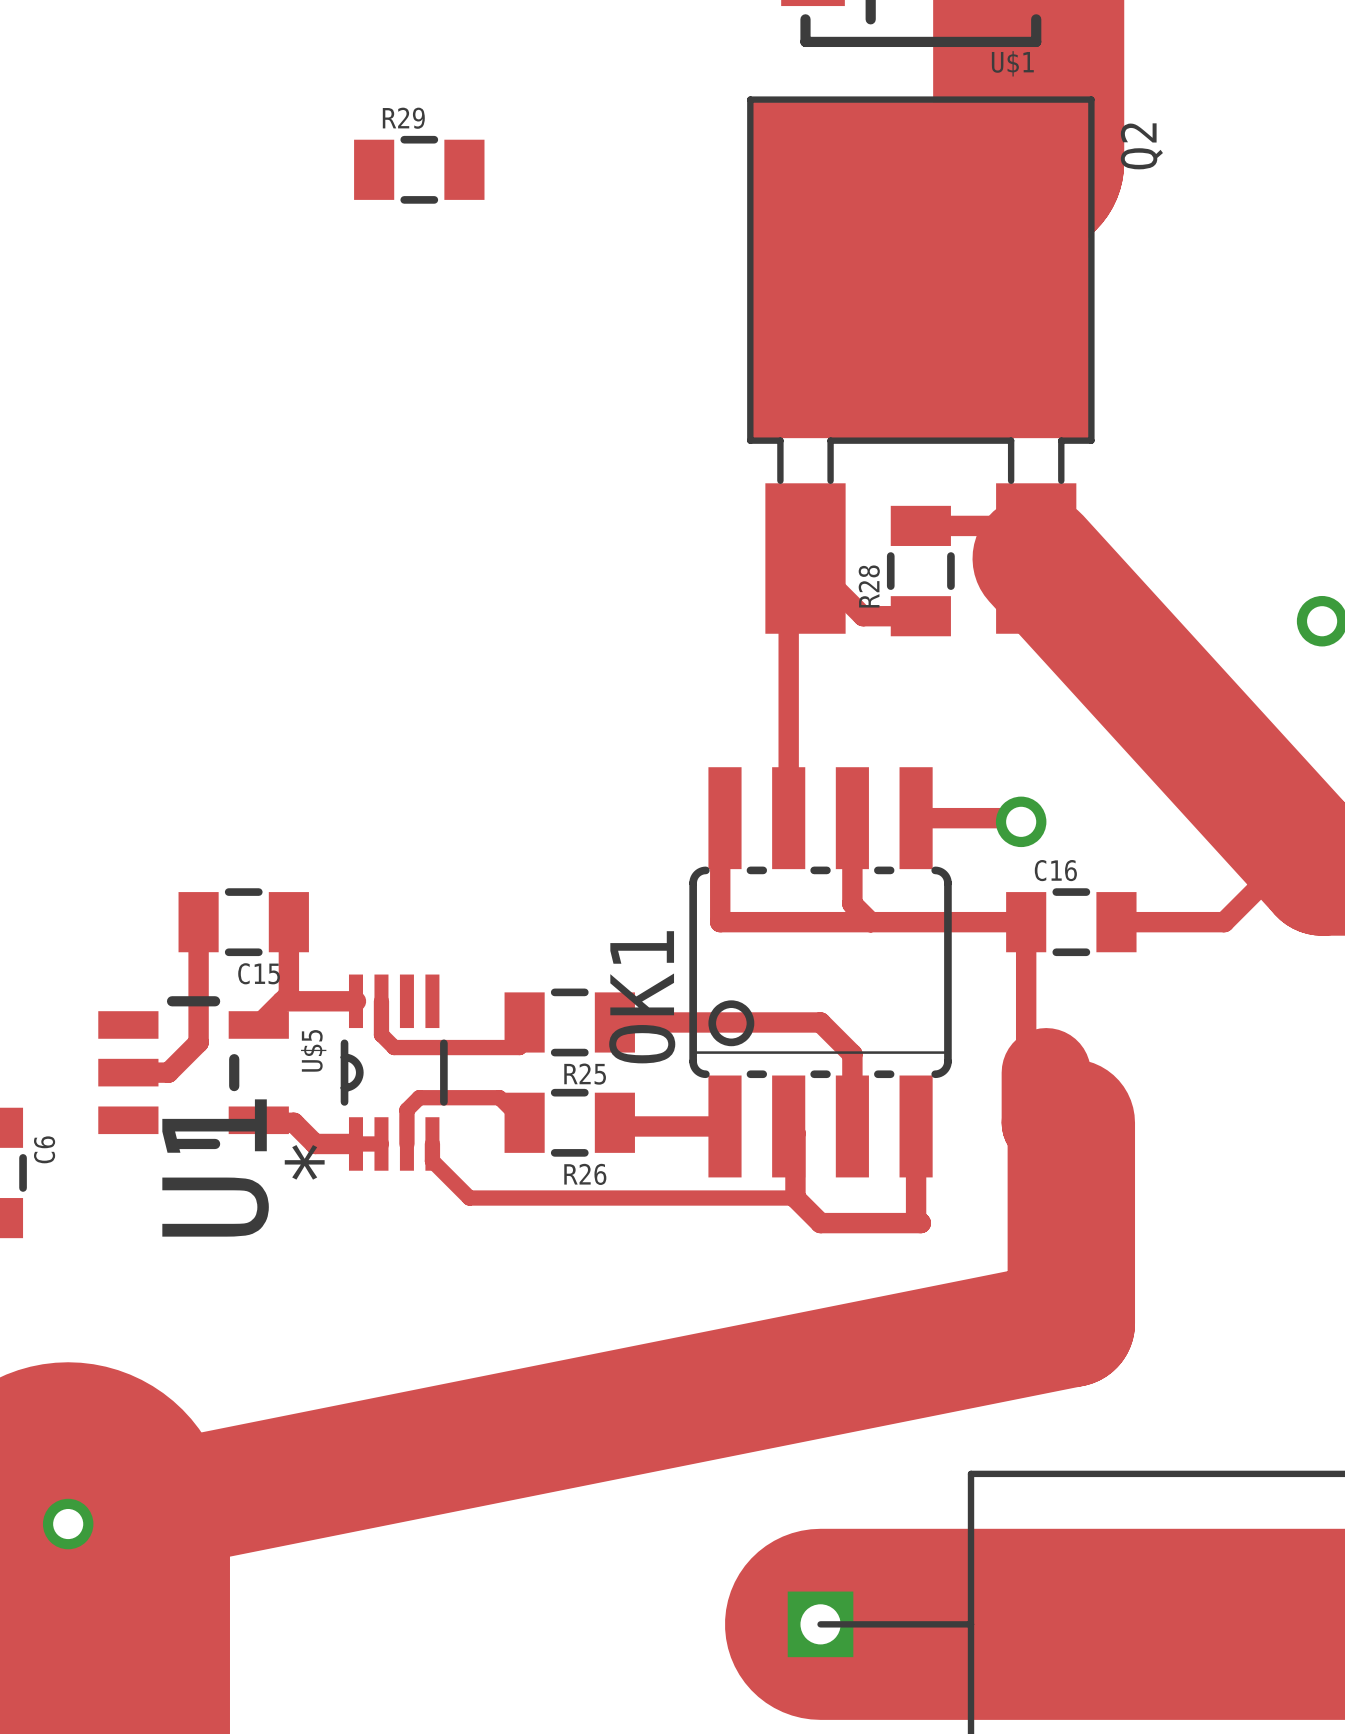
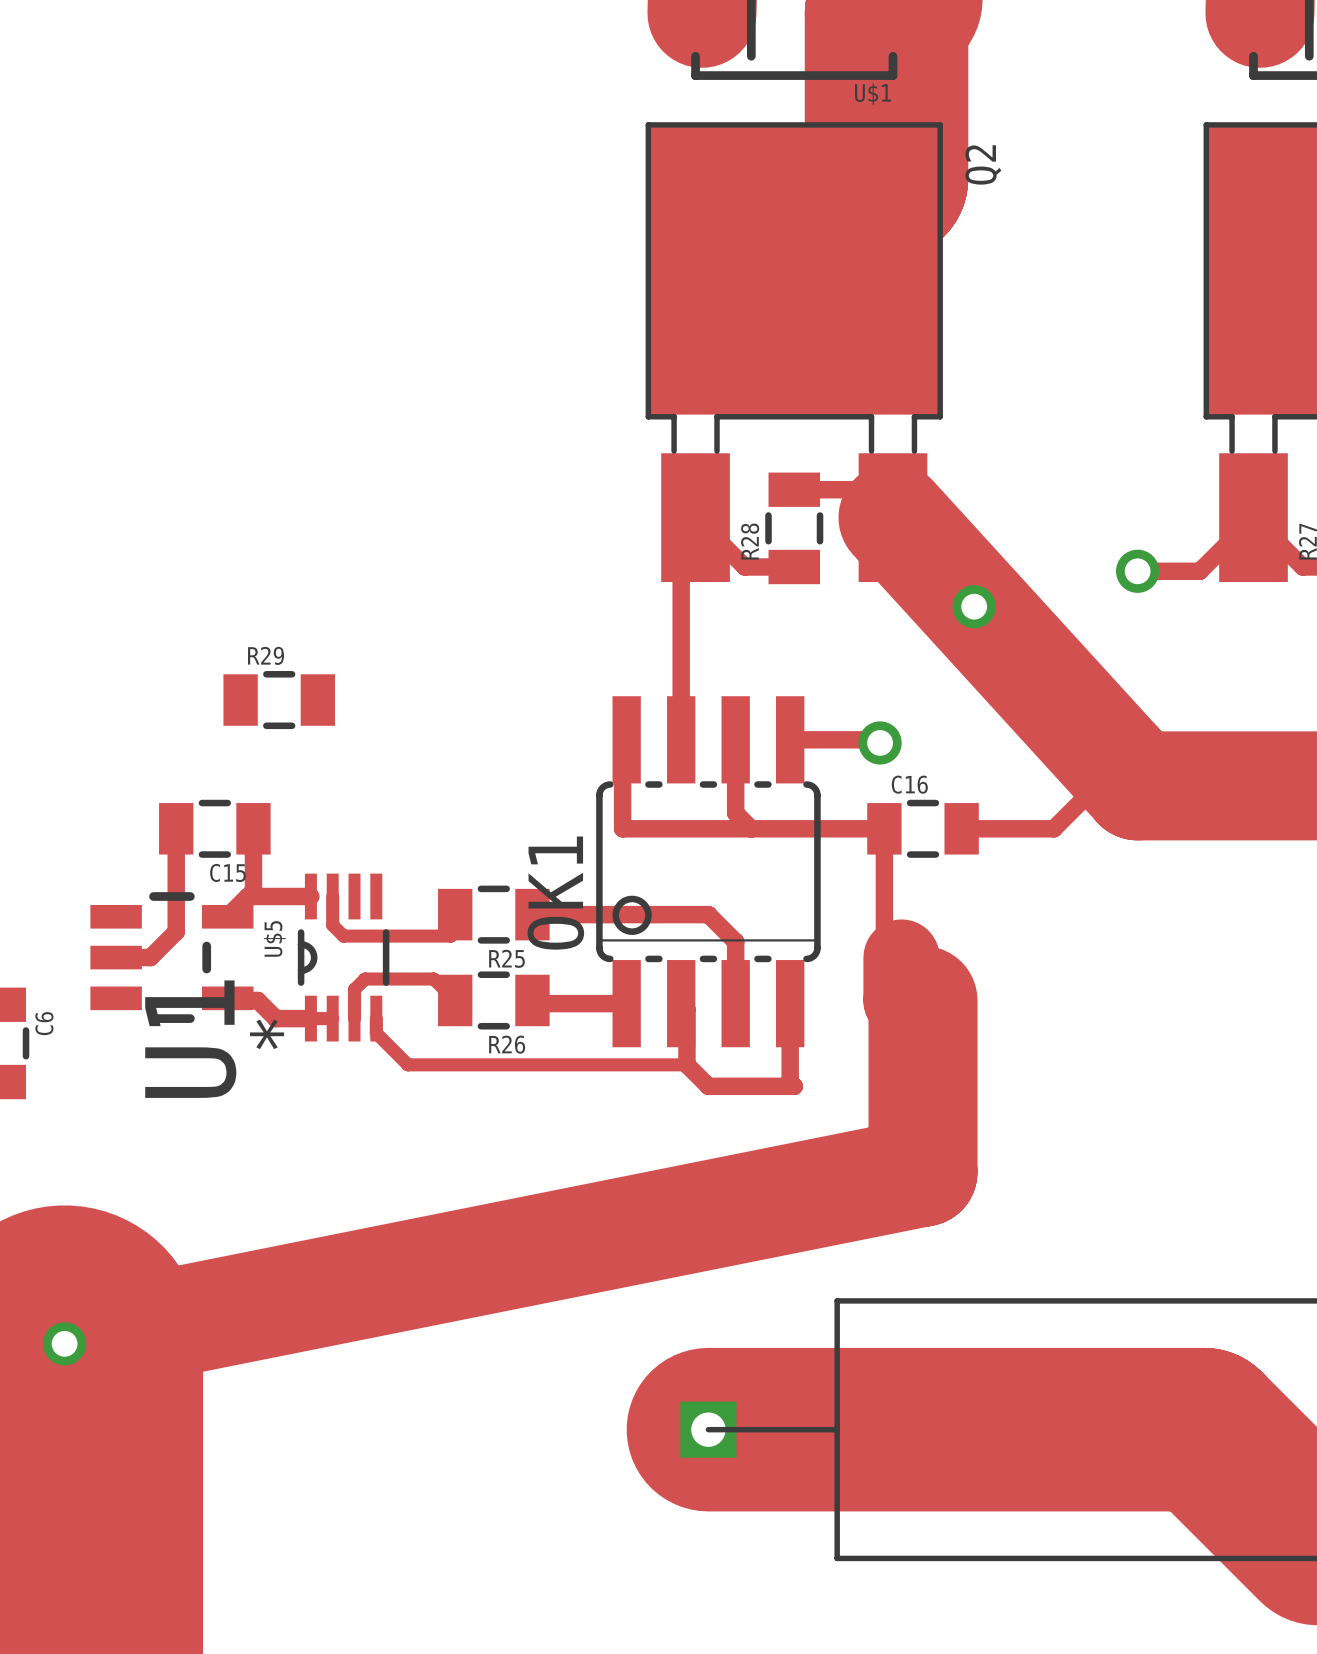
R29 position: (419, 169) -> (279, 700)
via: none -> (974, 606)

